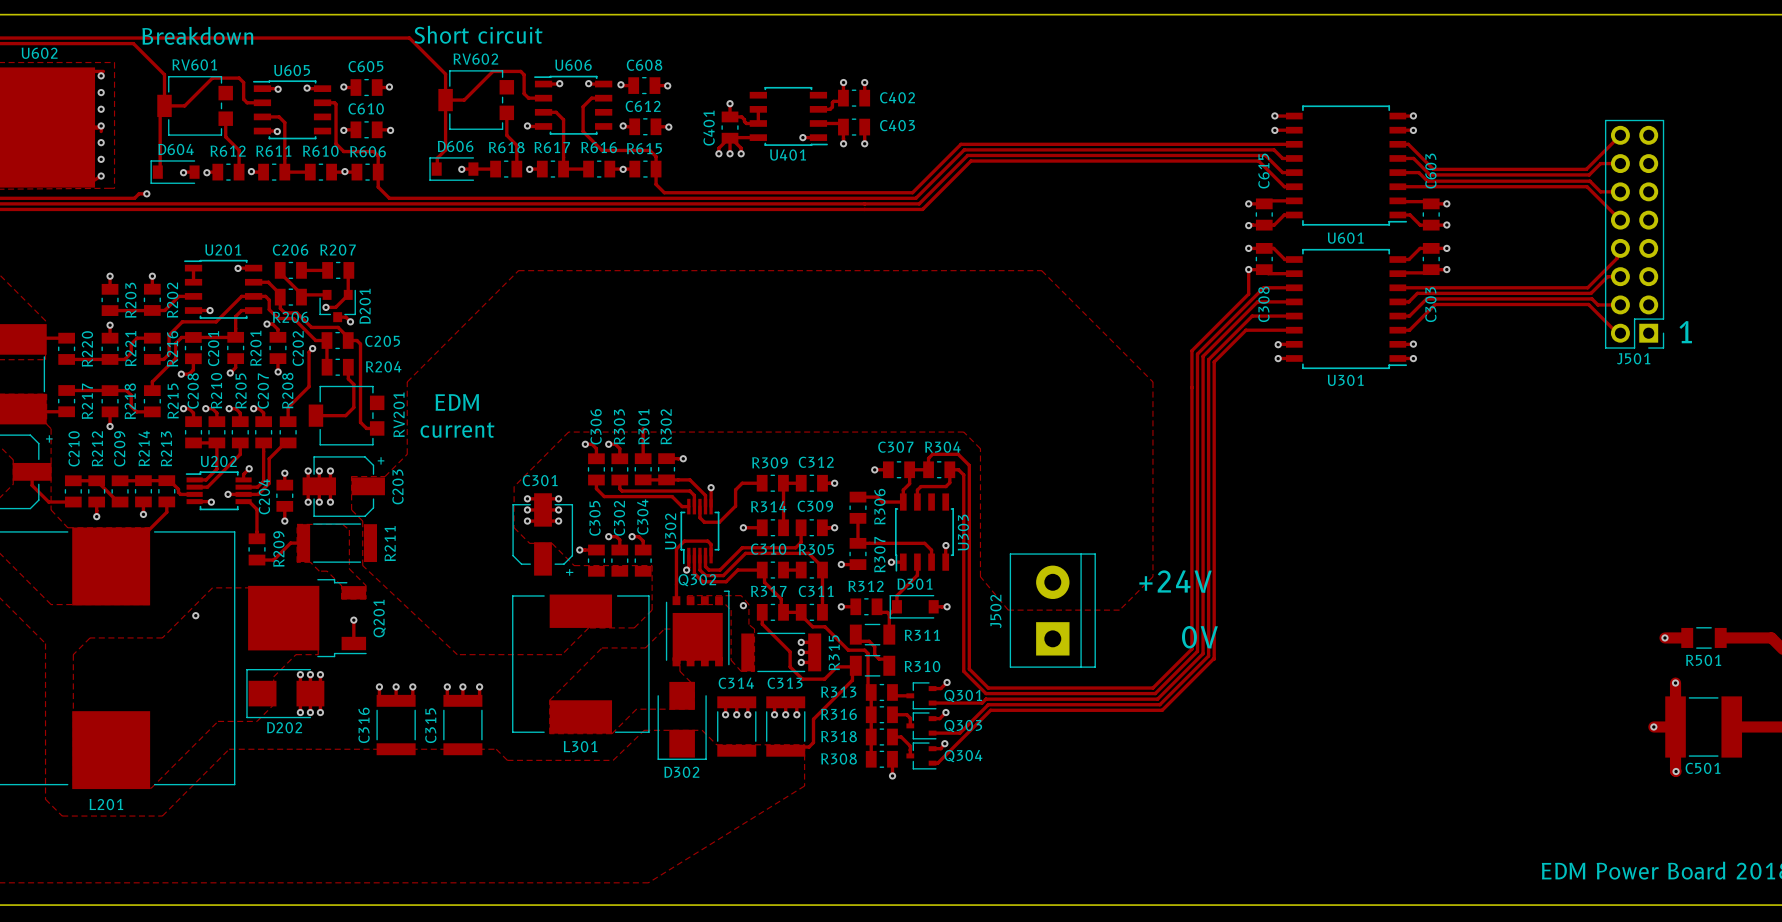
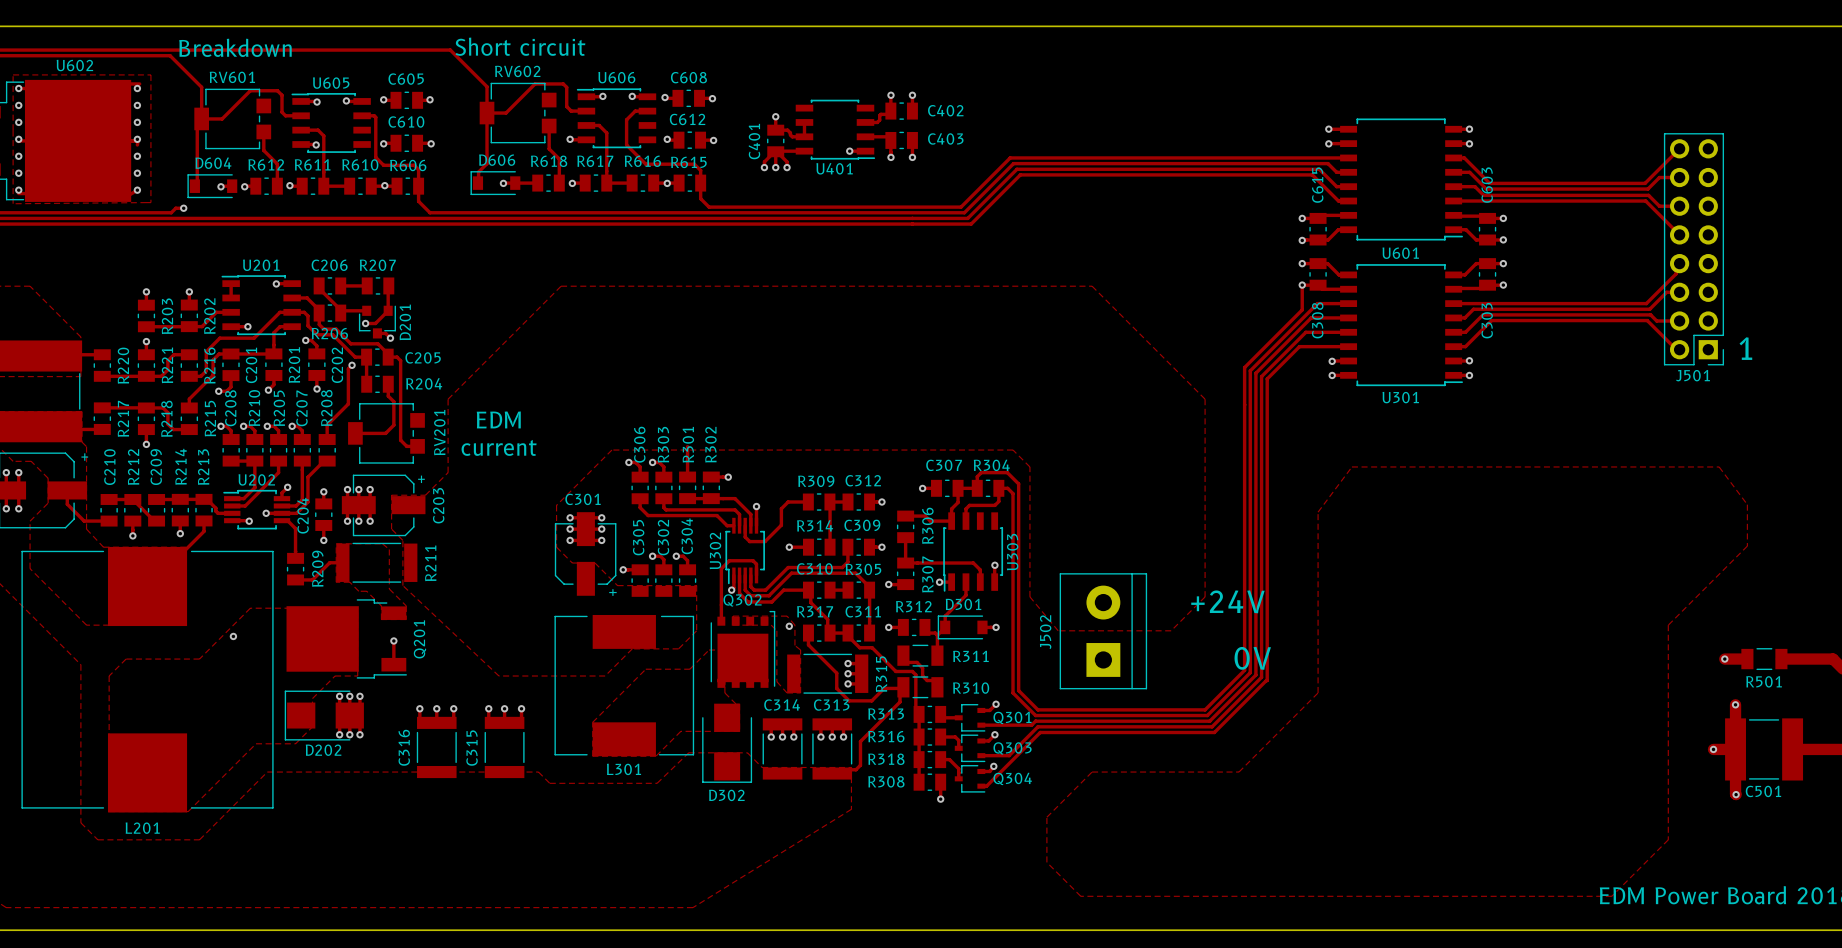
zone outline: none -> (1351, 466) (1318, 512) (1318, 692) (1238, 772) (1092, 772) (1046, 817) (1046, 862) (1080, 896) (1611, 896) (1668, 839) (1668, 625) (1747, 546) (1747, 504) (1719, 466) (1351, 466)

